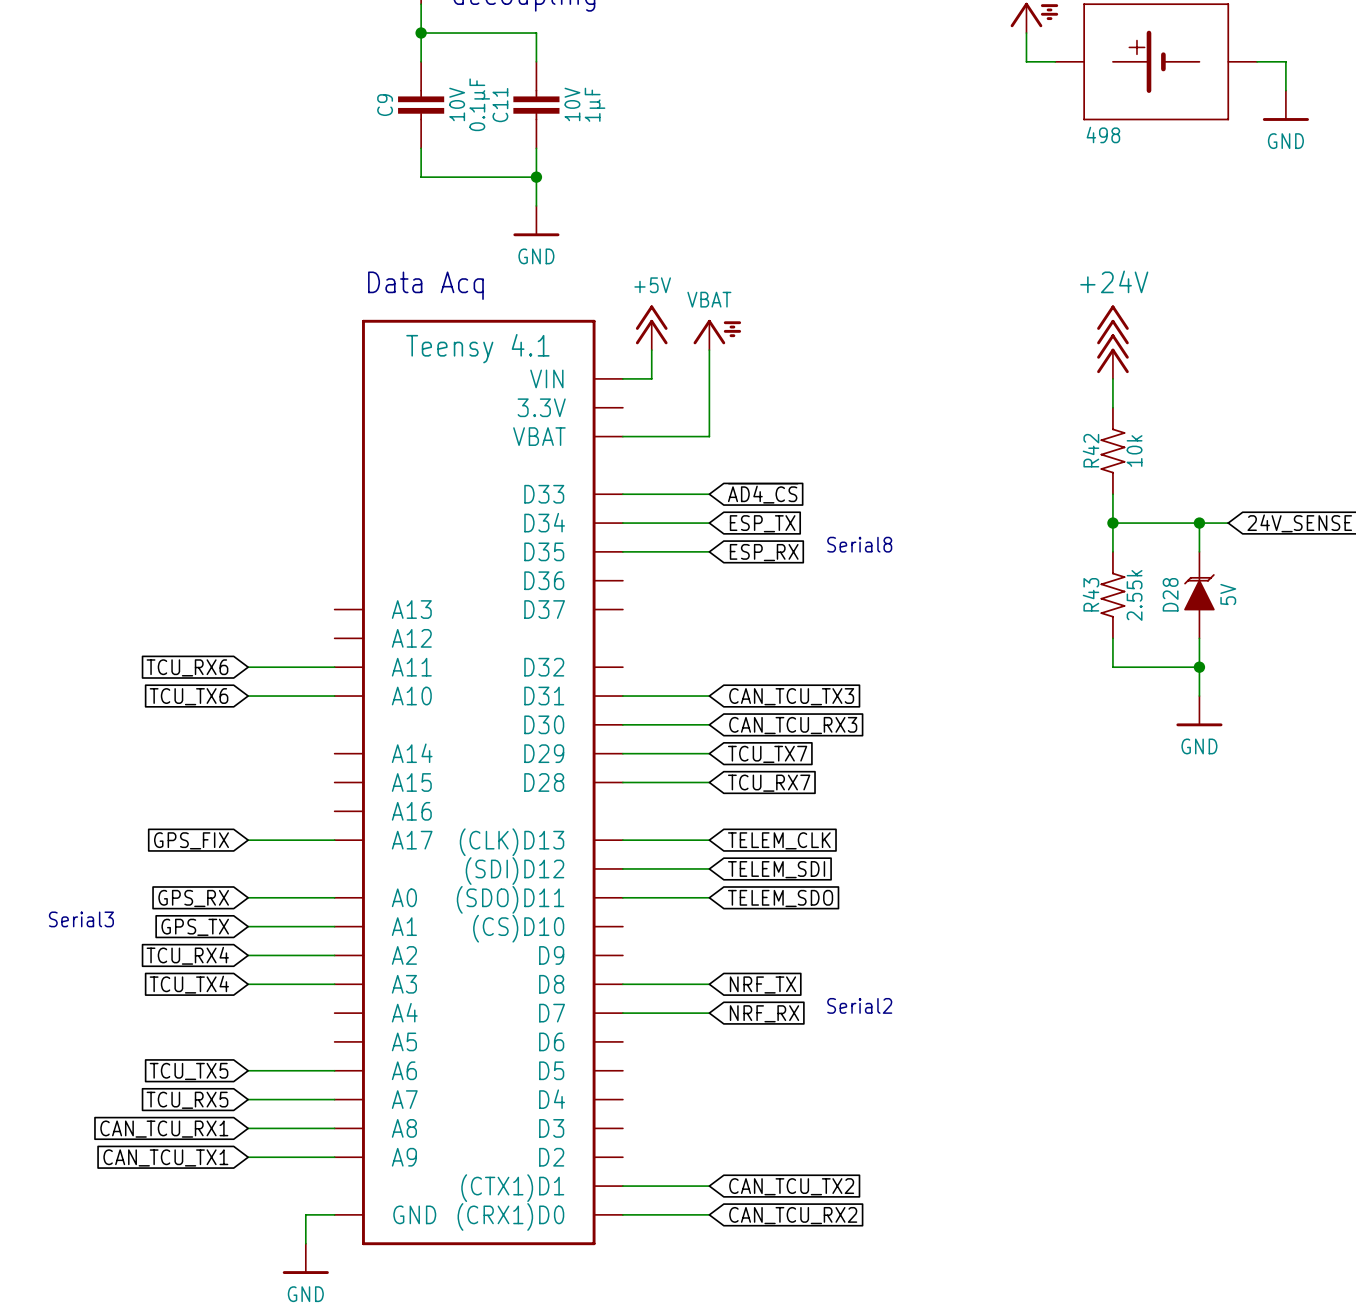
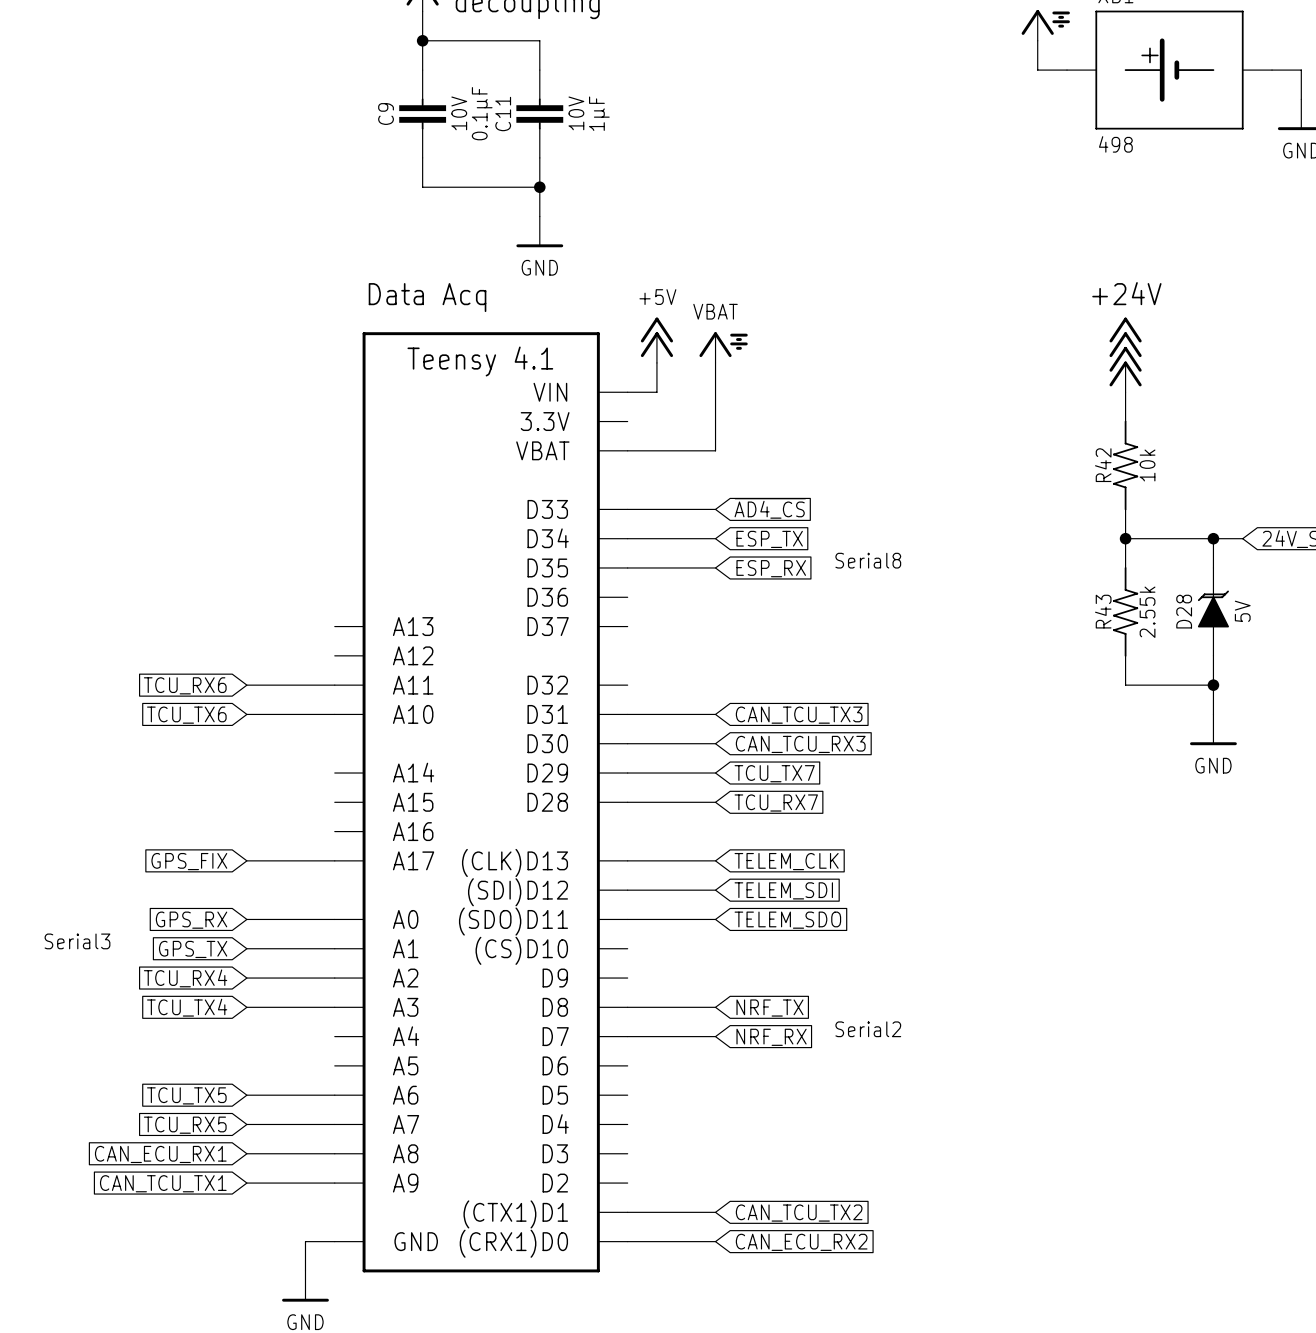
global label: CAN_TCU_RX1 (164, 1129) -> CAN_ECU_RX1 (160, 1154)
global label: CAN_TCU_RX2 (793, 1215) -> CAN_ECU_RX2 (801, 1242)

